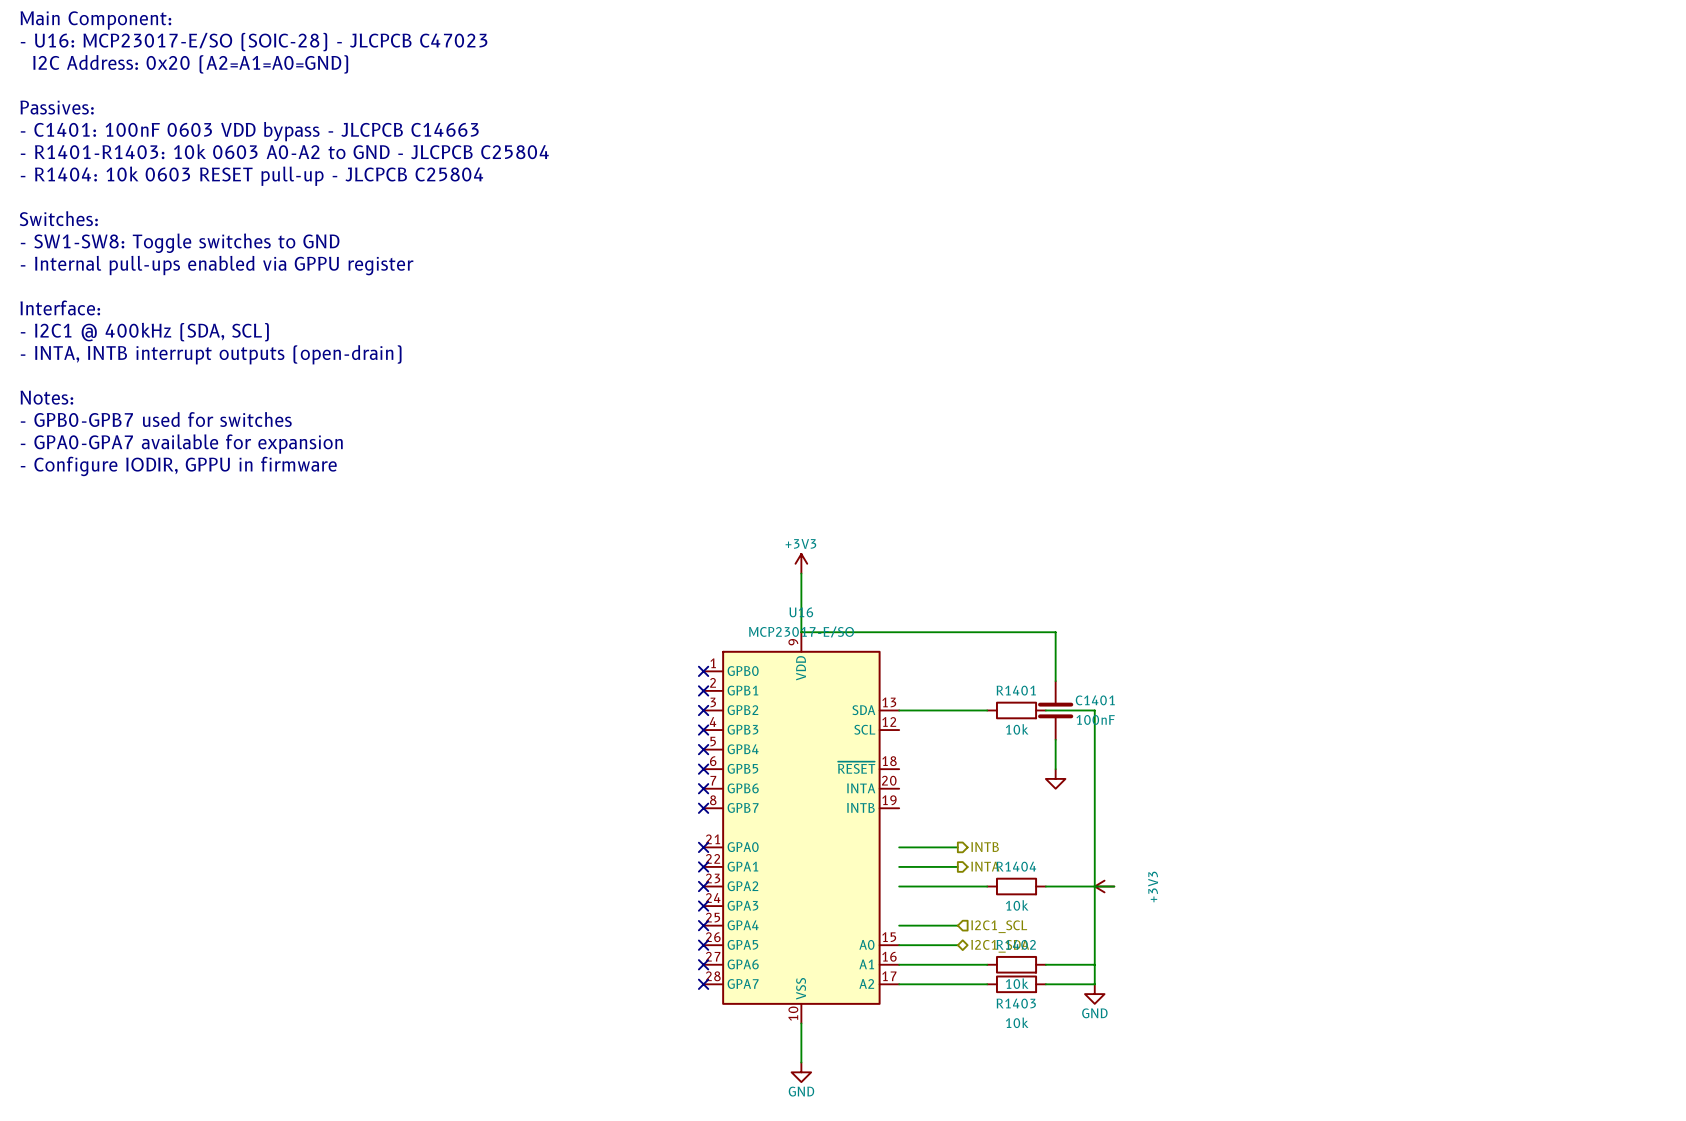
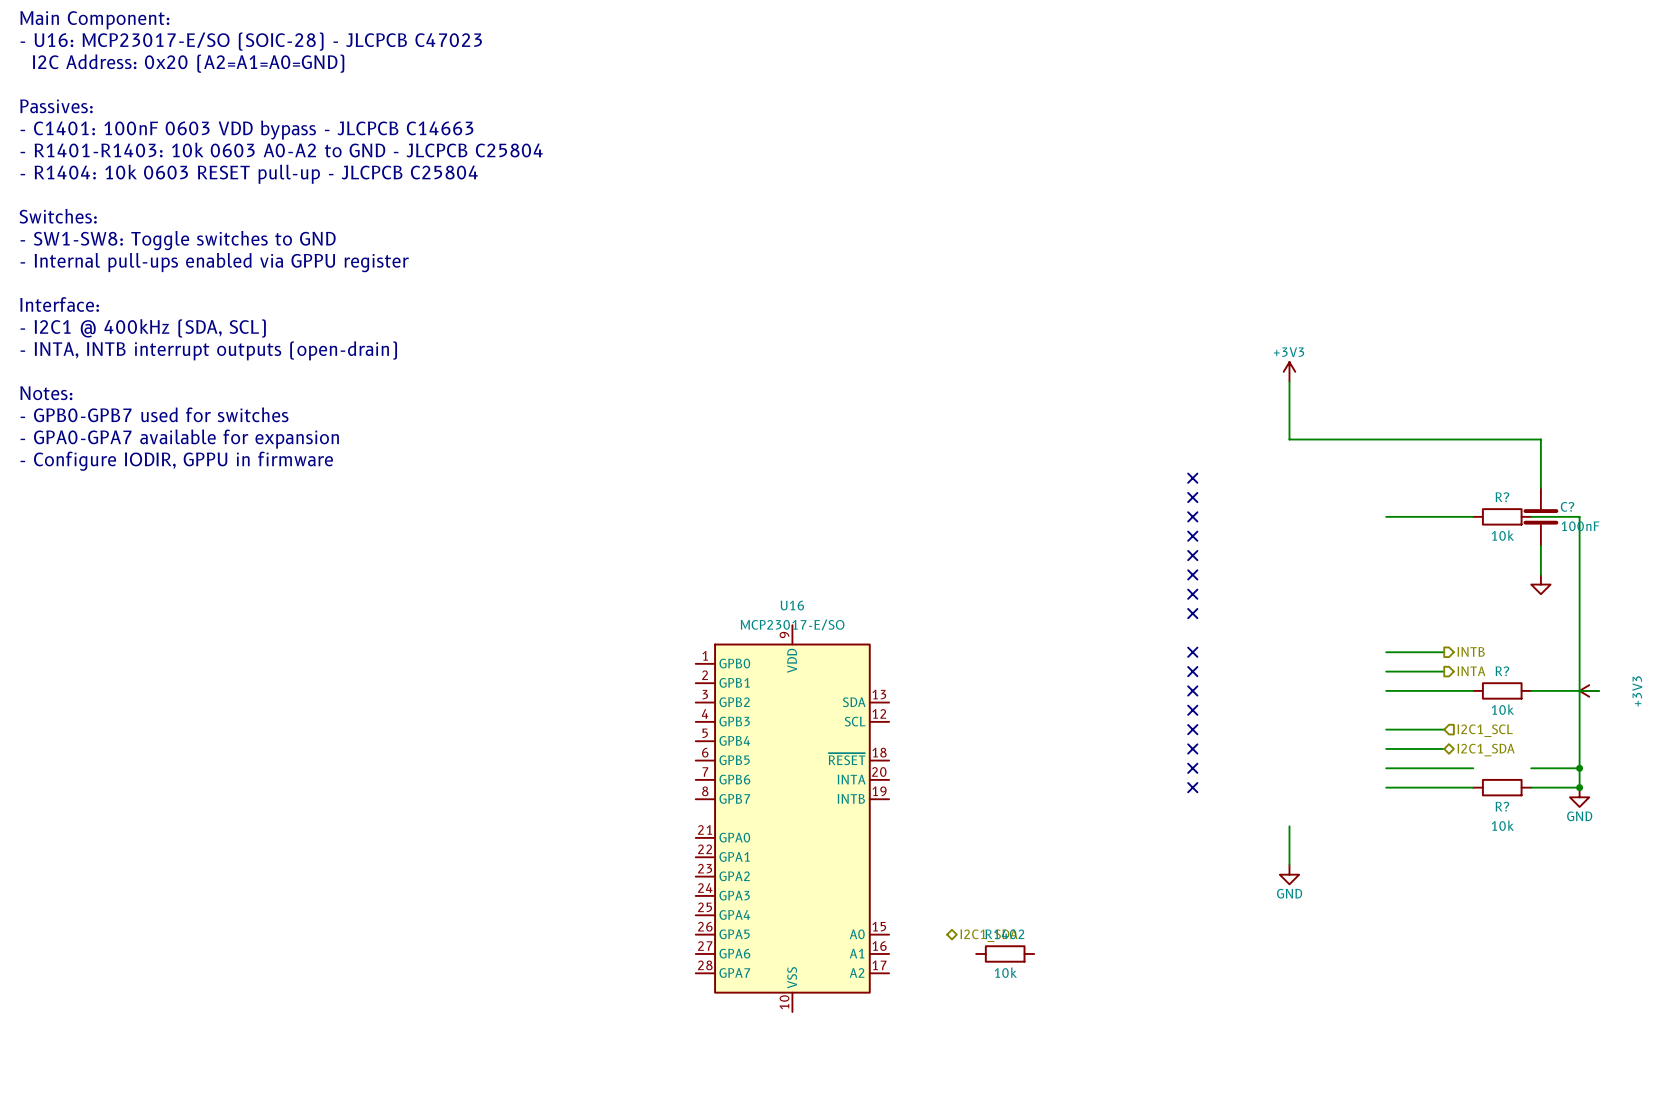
power symbol: none -> +3V3 (1289, 371)
wire: none -> (1289, 381) (1289, 439) (1540, 439) (1540, 487)
no-connect mark: none -> (1192, 478)
no-connect mark: none -> (1192, 497)
no-connect mark: none -> (1192, 516)
wire: none -> (1386, 516) (1473, 516)
R?: none -> 10k (1502, 516)
wire: none -> (1531, 516) (1579, 516) (1579, 787) (1531, 787)
C?: none -> 100nF (1540, 516)
no-connect mark: none -> (1192, 536)
wire: none -> (1540, 545) (1540, 574)
no-connect mark: none -> (1192, 555)
power symbol: +3V3 (801, 563) -> none
wire: (801, 573) (801, 632) (1055, 632) (1055, 681) -> none
no-connect mark: none -> (1192, 574)
power symbol: none -> (1540, 584)
no-connect mark: none -> (1192, 594)
no-connect mark: none -> (1192, 613)
no-connect mark: none -> (1192, 652)
wire: none -> (1386, 652) (1444, 652)
hierarchical label: none -> INTB (1471, 651)
no-connect mark: (703, 671) -> none
hierarchical label: none -> INTA (1471, 671)
no-connect mark: none -> (1192, 671)
wire: none -> (1386, 671) (1444, 671)
no-connect mark: (703, 690) -> none
no-connect mark: none -> (1192, 690)
wire: none -> (1386, 690) (1473, 690)
R?: none -> 10k (1502, 690)
wire: none -> (1531, 690) (1598, 690)
power symbol: none -> +3V3 (1589, 690)
no-connect mark: (703, 710) -> none
wire: (899, 710) (987, 710) -> none
R1401: 10k (1016, 710) -> none
wire: (1045, 710) (1094, 710) (1094, 984) (1045, 984) -> none
C1401: 100nF (1055, 710) -> none
no-connect mark: none -> (1192, 710)
no-connect mark: (703, 730) -> none
no-connect mark: none -> (1192, 729)
wire: none -> (1386, 729) (1444, 729)
hierarchical label: none -> I2C1_SCL (1485, 730)
wire: (1055, 739) (1055, 769) -> none
no-connect mark: (703, 749) -> none
no-connect mark: none -> (1192, 748)
wire: none -> (1386, 748) (1444, 748)
hierarchical label: none -> I2C1_SDA (1486, 750)
no-connect mark: (703, 769) -> none
no-connect mark: none -> (1192, 768)
wire: none -> (1386, 768) (1473, 768)
wire: none -> (1531, 768) (1579, 768)
junction: none -> (1579, 768)
power symbol: (1055, 778) -> none
no-connect mark: (703, 788) -> none
no-connect mark: none -> (1192, 787)
wire: none -> (1386, 787) (1473, 787)
R?: none -> 10k (1502, 787)
junction: none -> (1579, 787)
power symbol: none -> GND (1579, 797)
no-connect mark: (703, 808) -> none
wire: none -> (1289, 826) (1289, 865)
no-connect mark: (703, 847) -> none
wire: (899, 847) (957, 847) -> none
hierarchical label: INTB (985, 847) -> none
no-connect mark: (703, 866) -> none
wire: (899, 866) (957, 866) -> none
hierarchical label: INTA (985, 866) -> none
power symbol: none -> GND (1289, 874)
no-connect mark: (703, 886) -> none
wire: (899, 886) (987, 886) -> none
R1404: 10k (1016, 886) -> none
wire: (1045, 886) (1114, 886) -> none
power symbol: +3V3 (1104, 886) -> none
no-connect mark: (703, 906) -> none
no-connect mark: (703, 925) -> none
wire: (899, 925) (957, 925) -> none
hierarchical label: I2C1_SCL (999, 926) -> none
no-connect mark: (703, 945) -> none
wire: (899, 945) (957, 945) -> none
no-connect mark: (703, 964) -> none
wire: (899, 964) (987, 964) -> none
wire: (1045, 964) (1094, 964) -> none
no-connect mark: (703, 984) -> none
wire: (899, 984) (987, 984) -> none
R1403: 10k (1016, 984) -> none
power symbol: GND (1094, 994) -> none
wire: (801, 1023) (801, 1062) -> none
power symbol: GND (801, 1072) -> none

